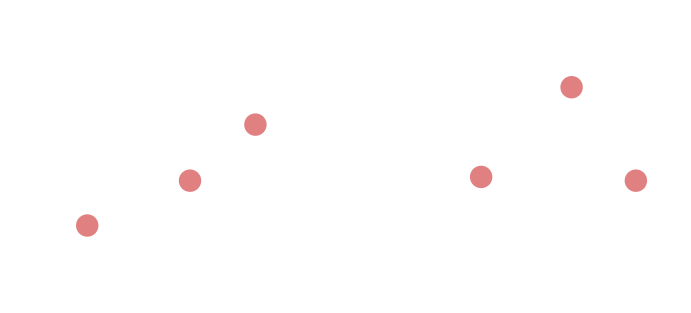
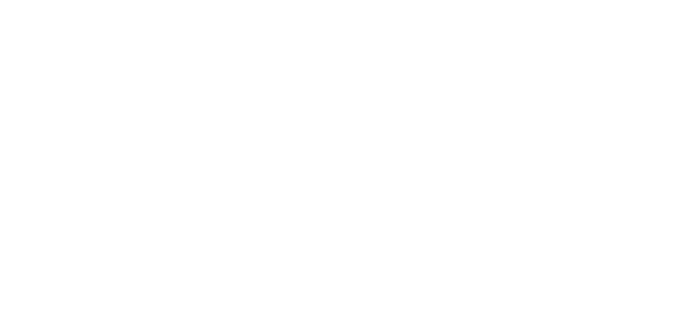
part: (571, 87) -> none
part: (255, 124) -> none
part: (481, 176) -> none
part: (190, 180) -> none
part: (635, 180) -> none
part: (87, 225) -> none

